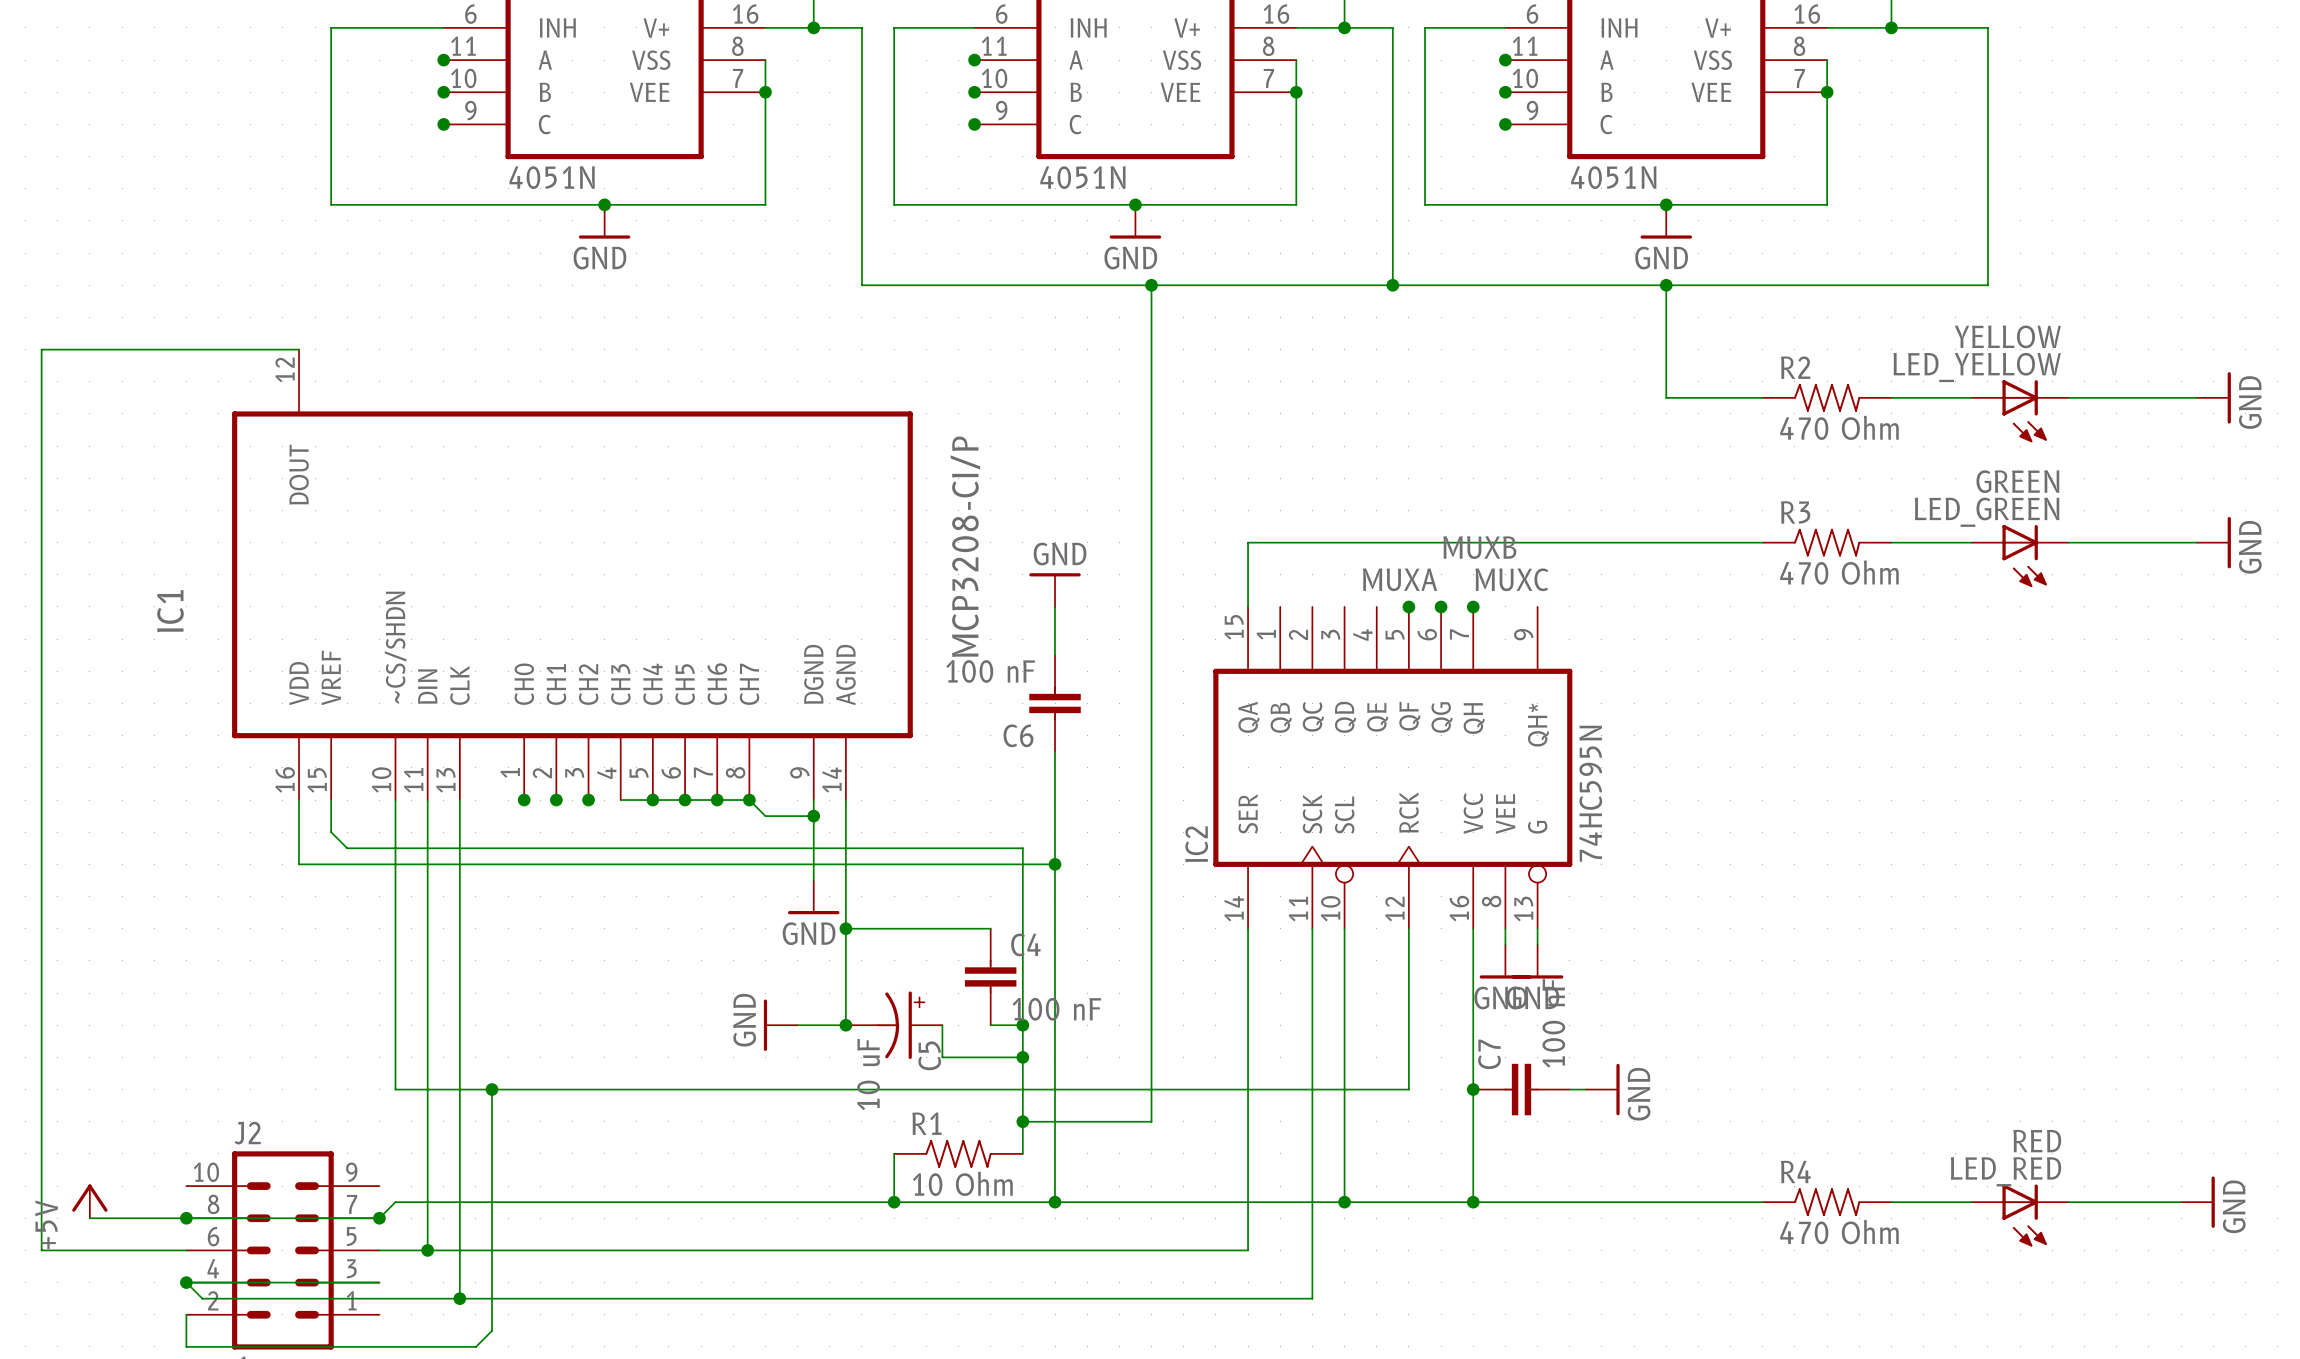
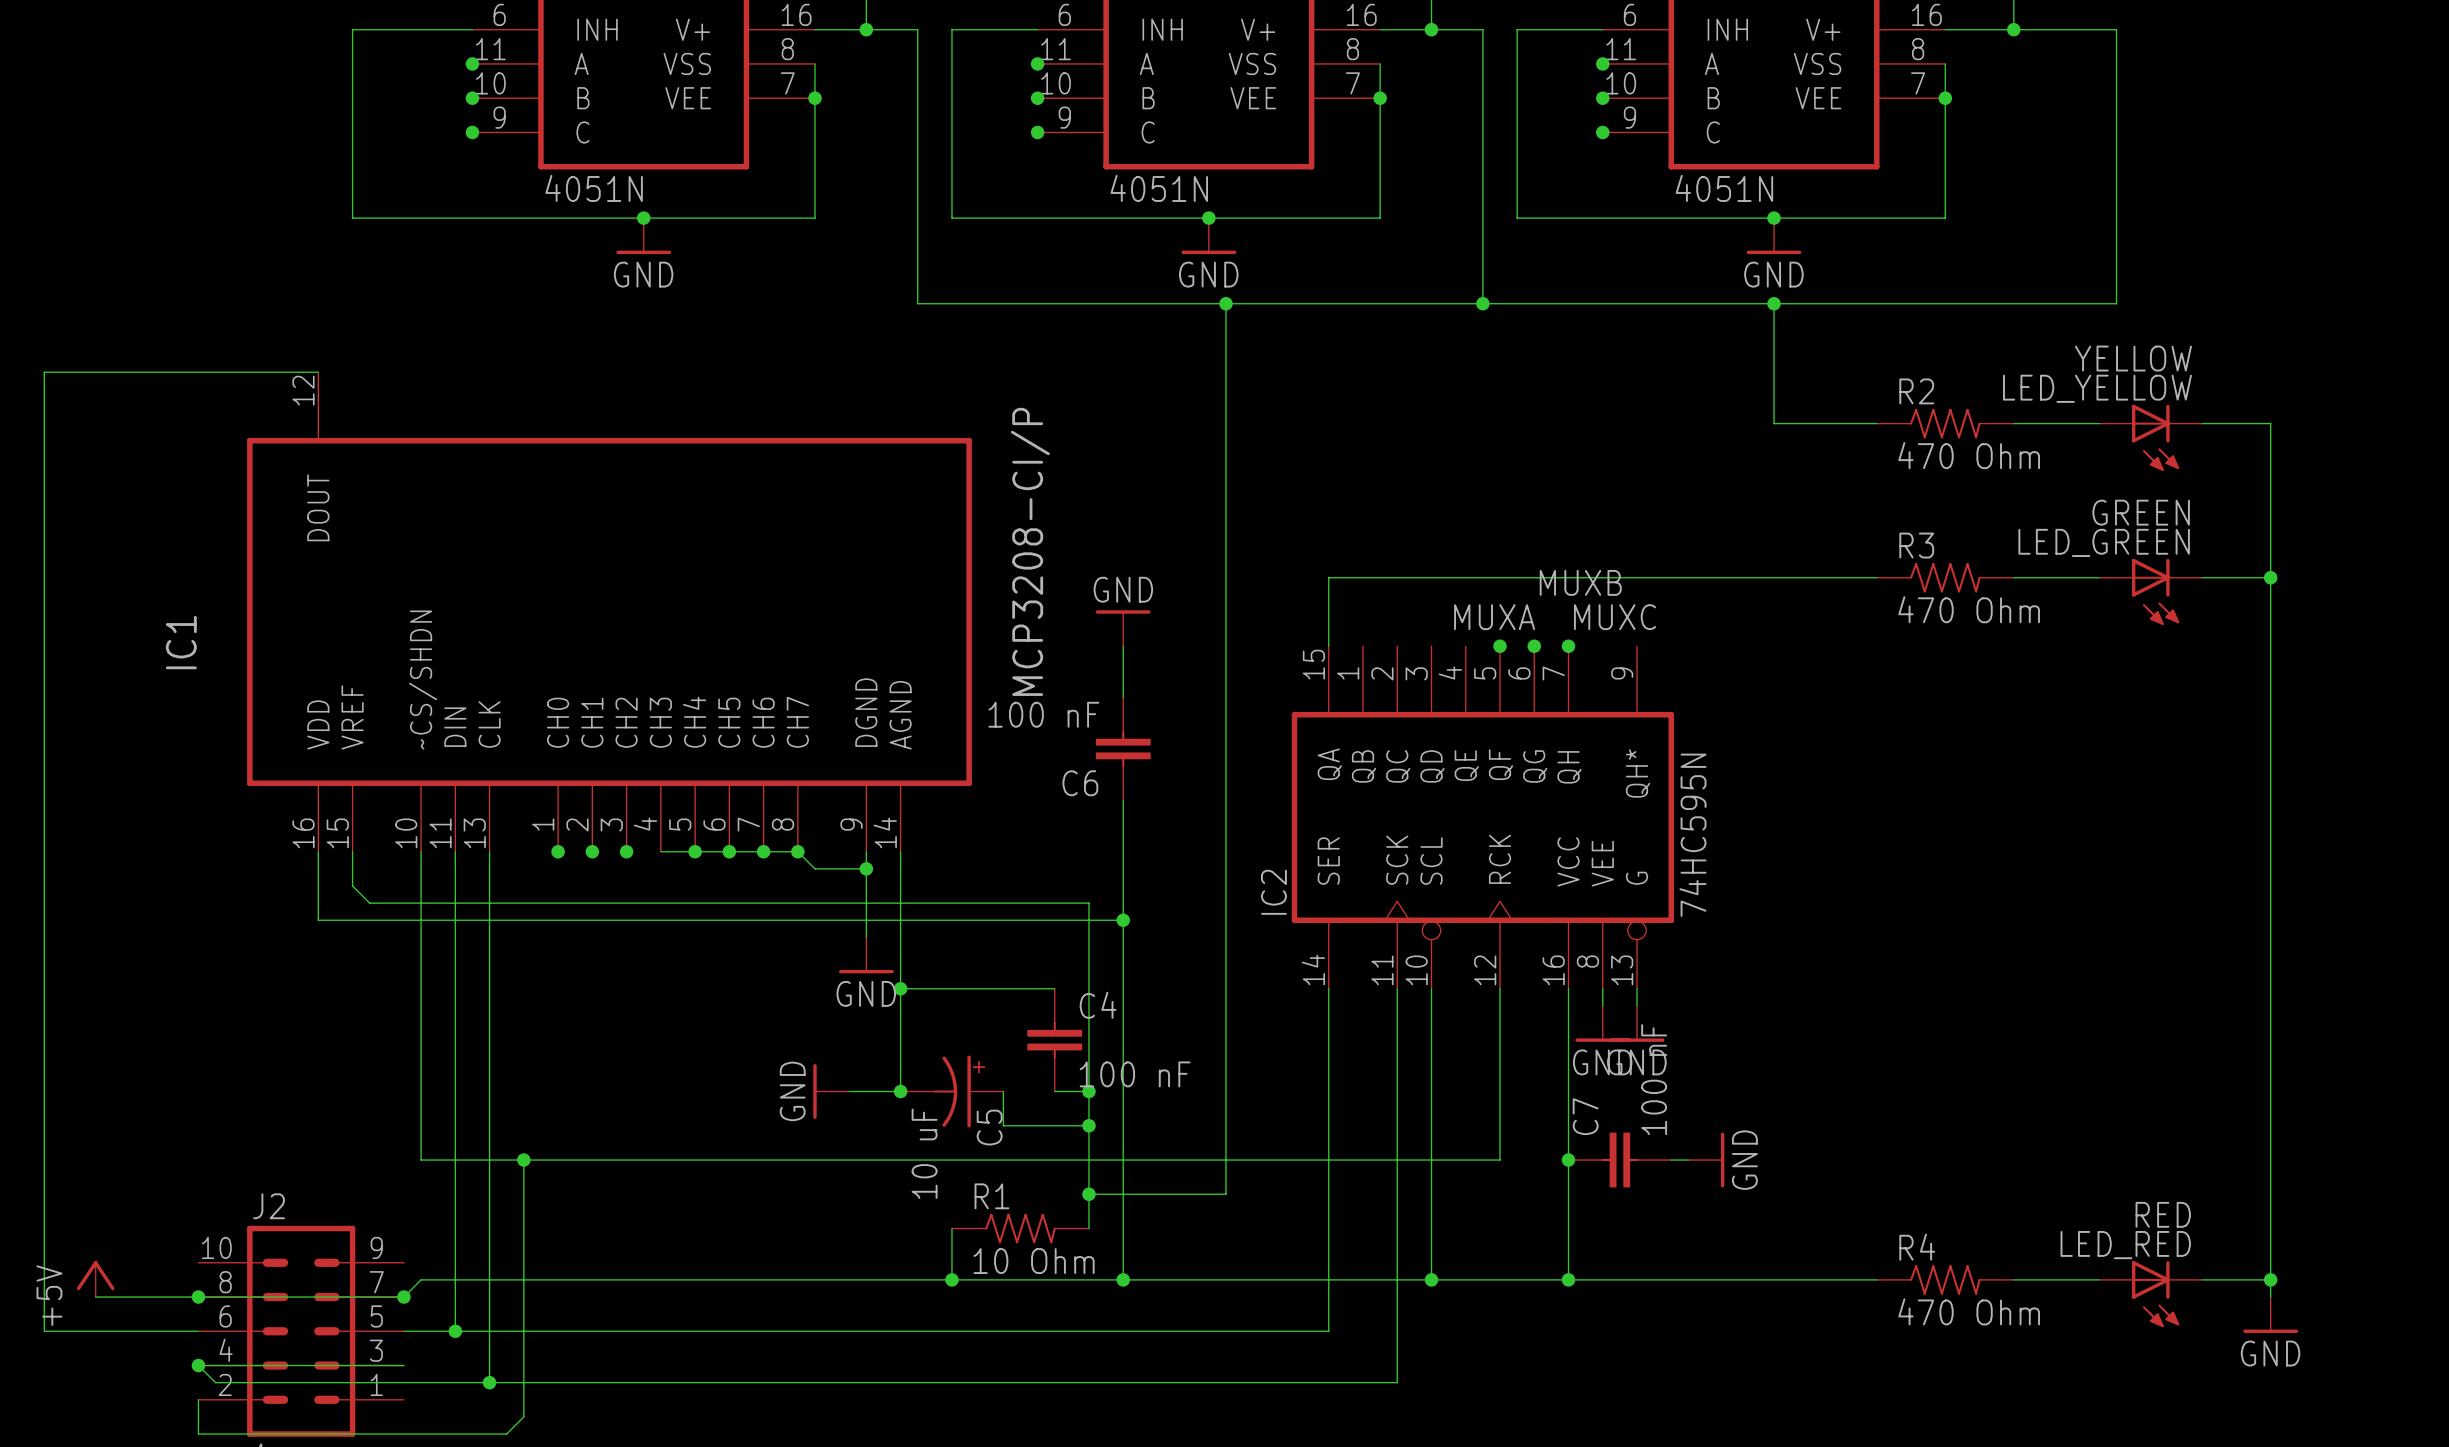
wire: (2132, 397) (2197, 397) -> (2270, 423) (2270, 1297)
power symbol: GND (2213, 397) -> none
wire: (2132, 542) (2197, 542) -> none
junction: none -> (2270, 577)
power symbol: GND (2213, 542) -> none
wire: (2132, 1202) (2181, 1202) -> none
junction: none -> (2270, 1279)
power symbol position: GND (2197, 1202) -> GND (2270, 1315)
power symbol rotation: 0° (2213, 1202) -> 90° clockwise (2270, 1331)

